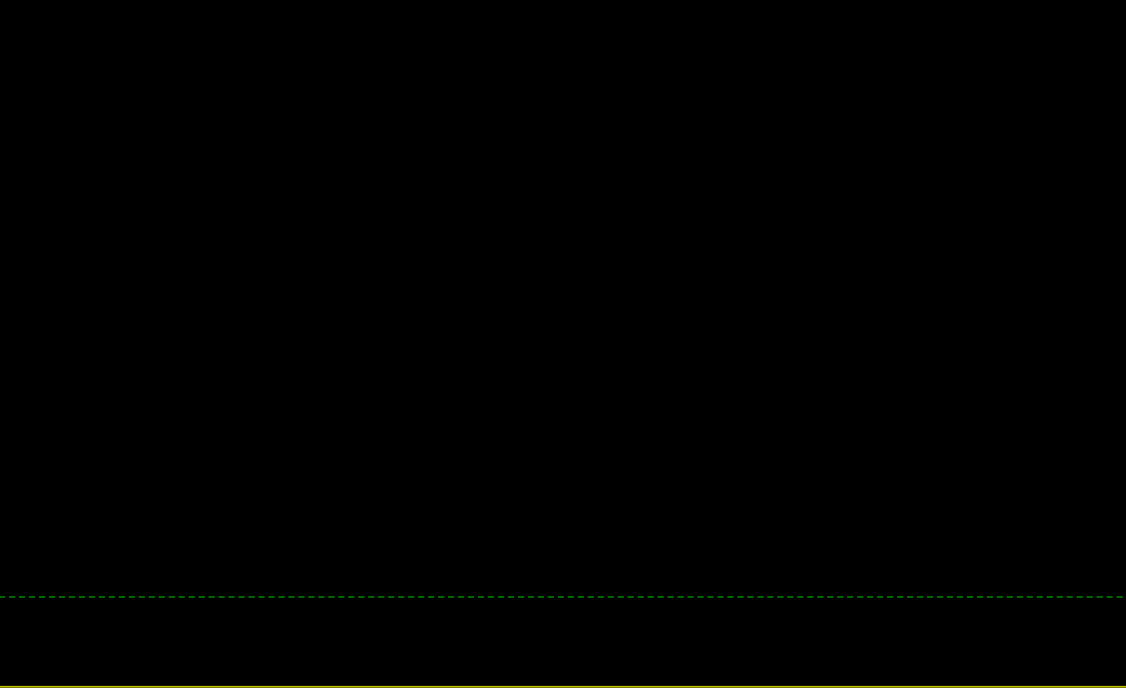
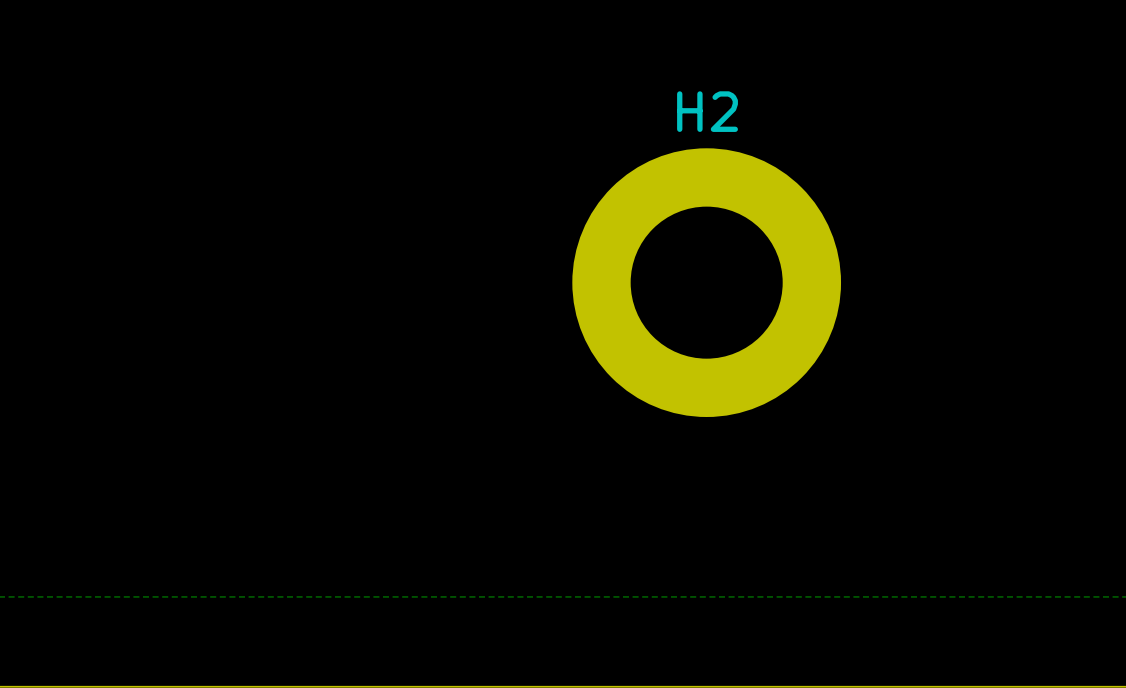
H2: none -> (706, 282)

